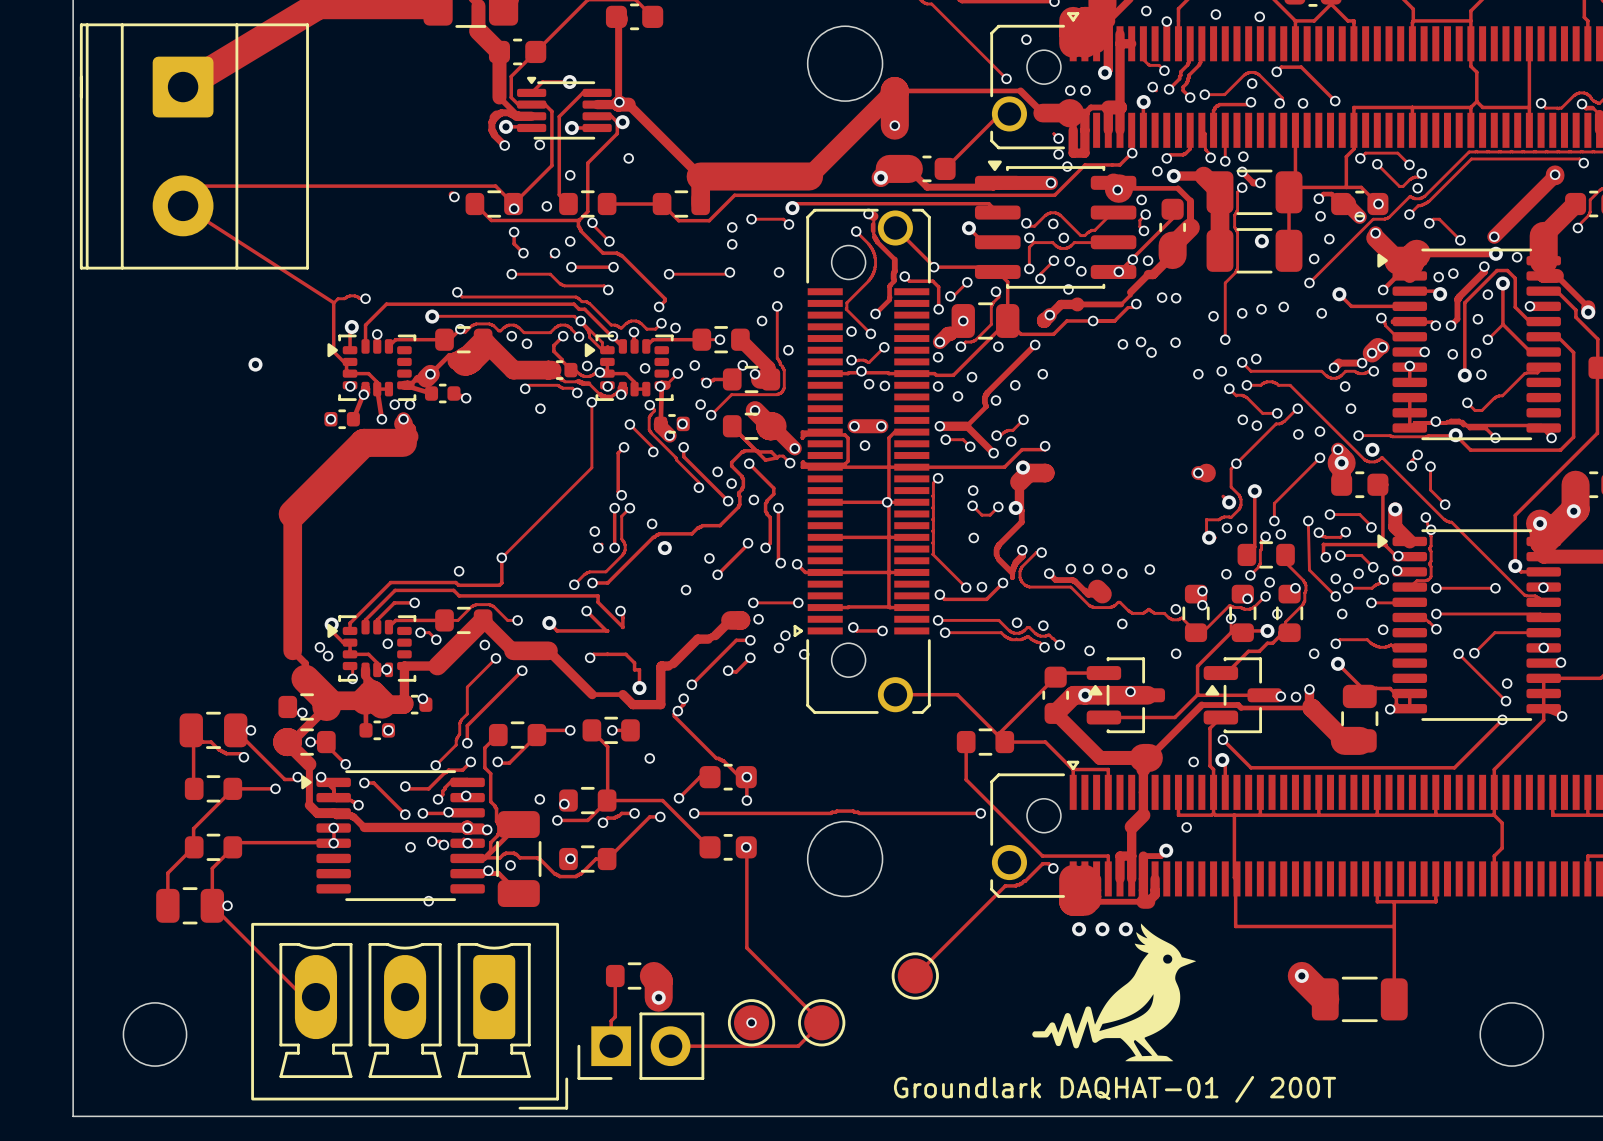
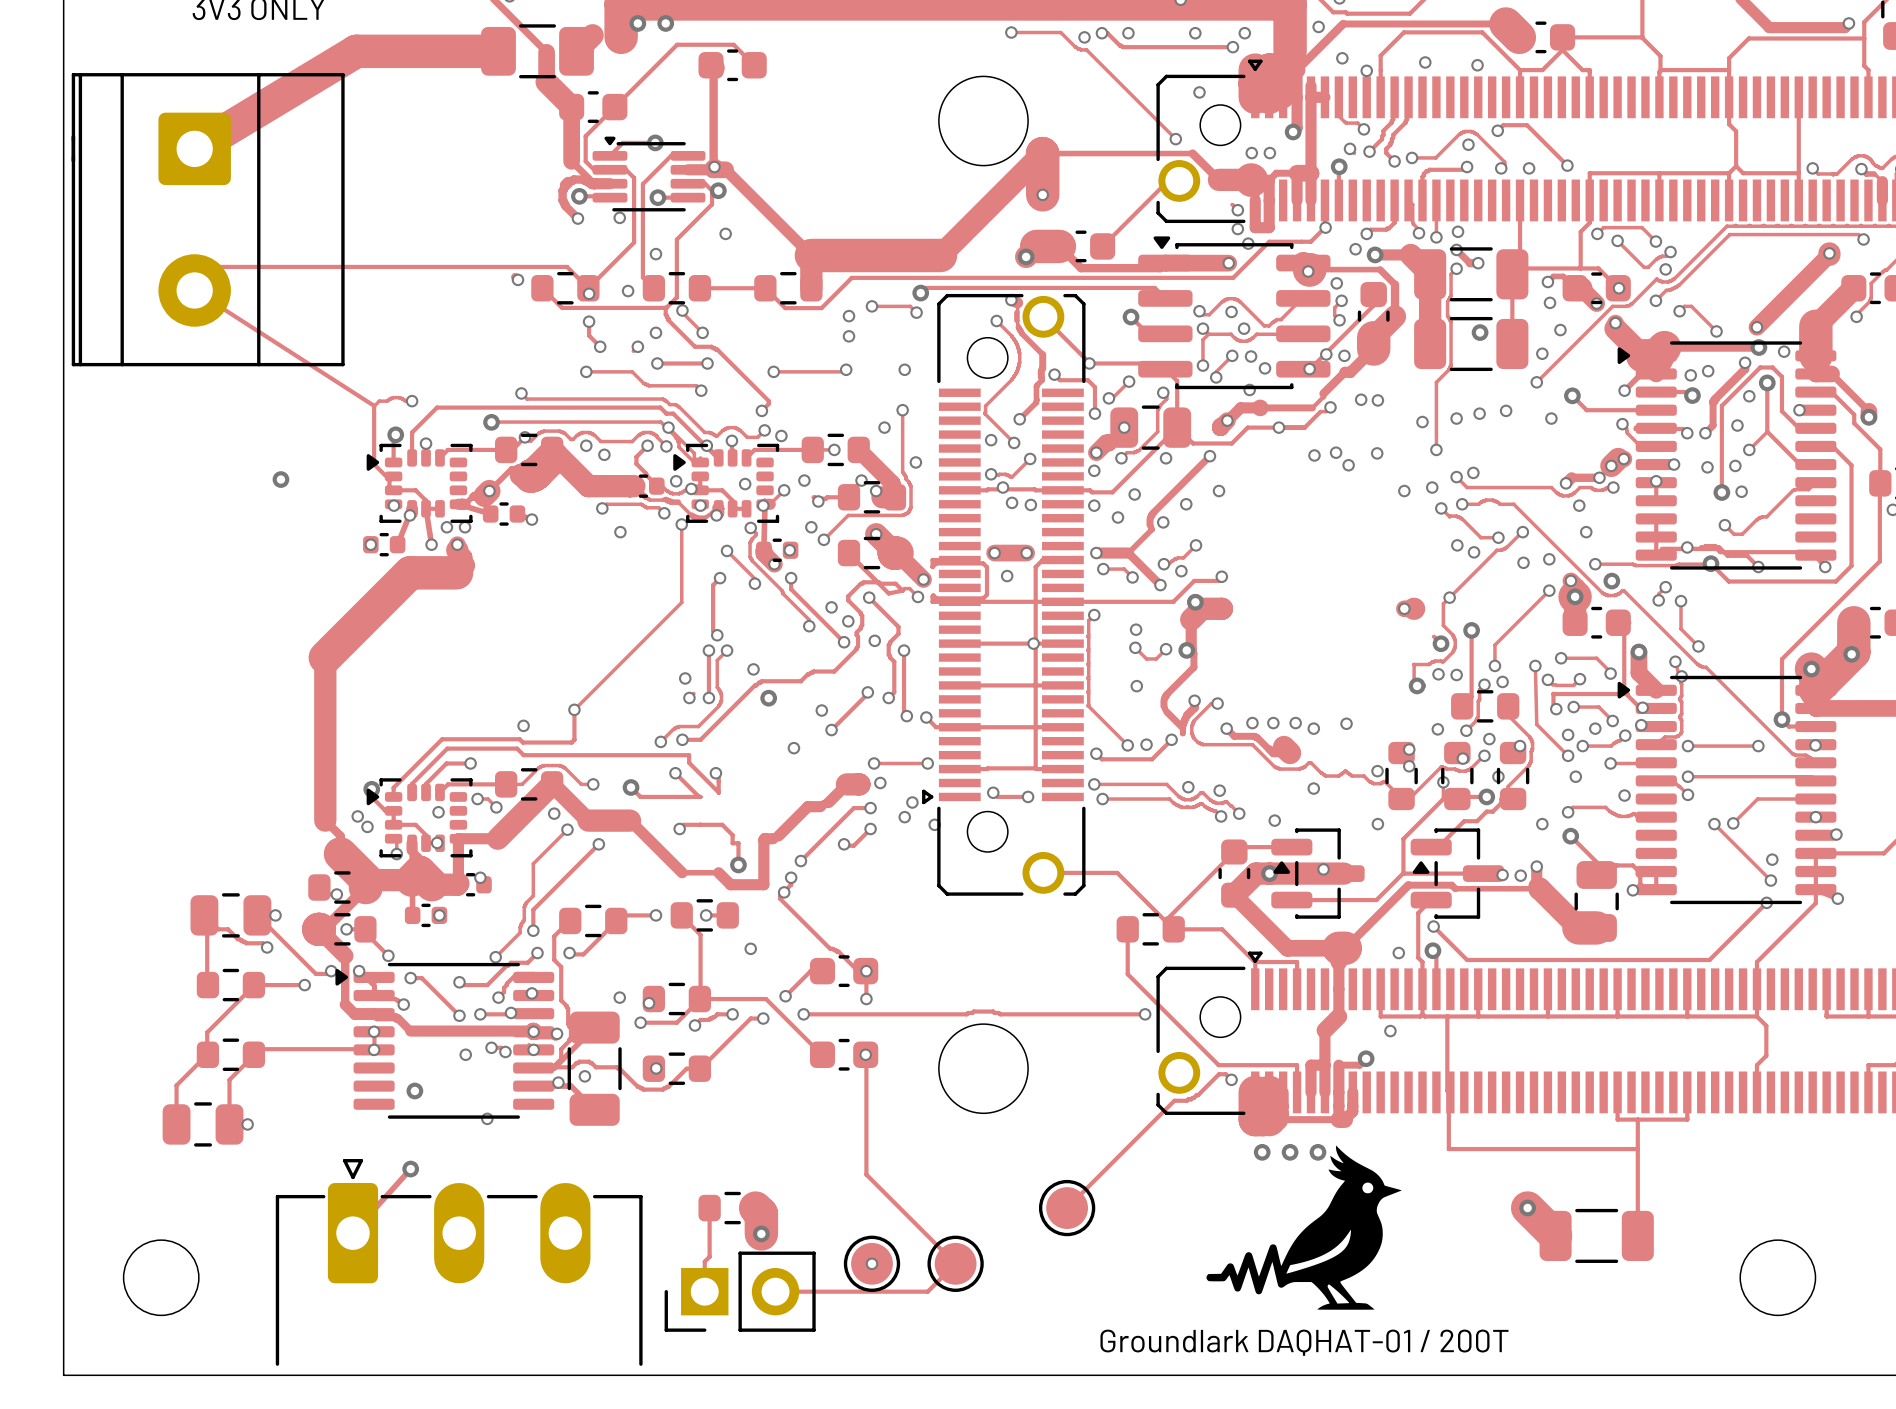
via: none -> (414, 1090)
track: (212, 905) (303, 997) (316, 997) -> (410, 1169) (352, 1233)
part footprint: [251, 922, 569, 1110] -> [275, 1159, 643, 1366]
via: none -> (410, 1169)

